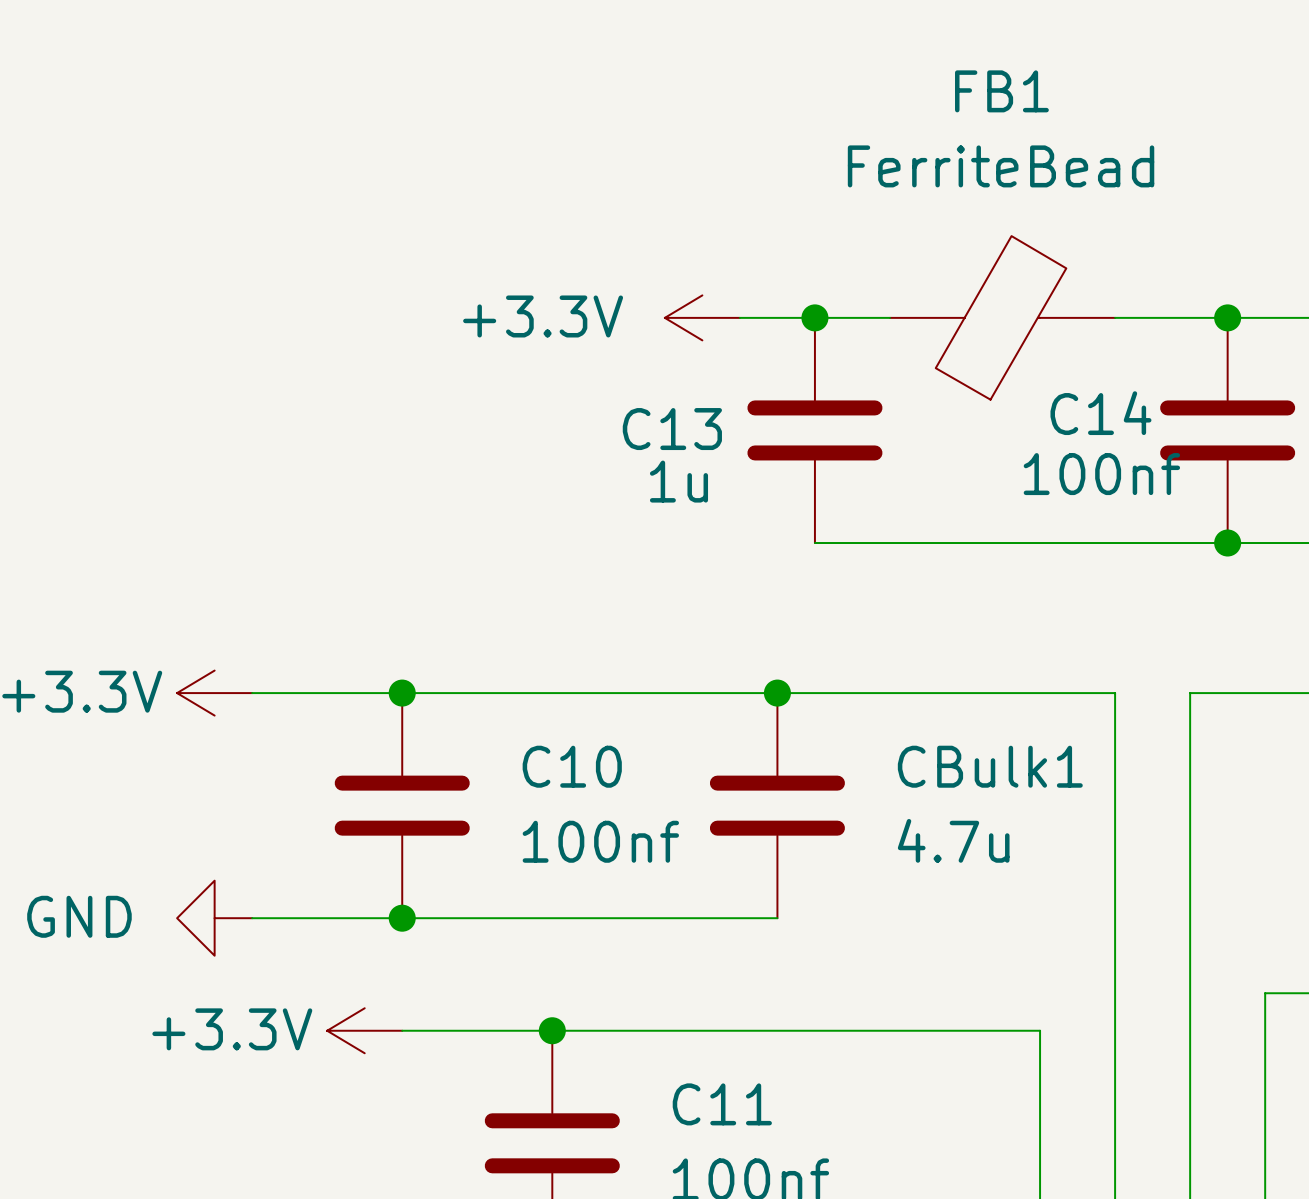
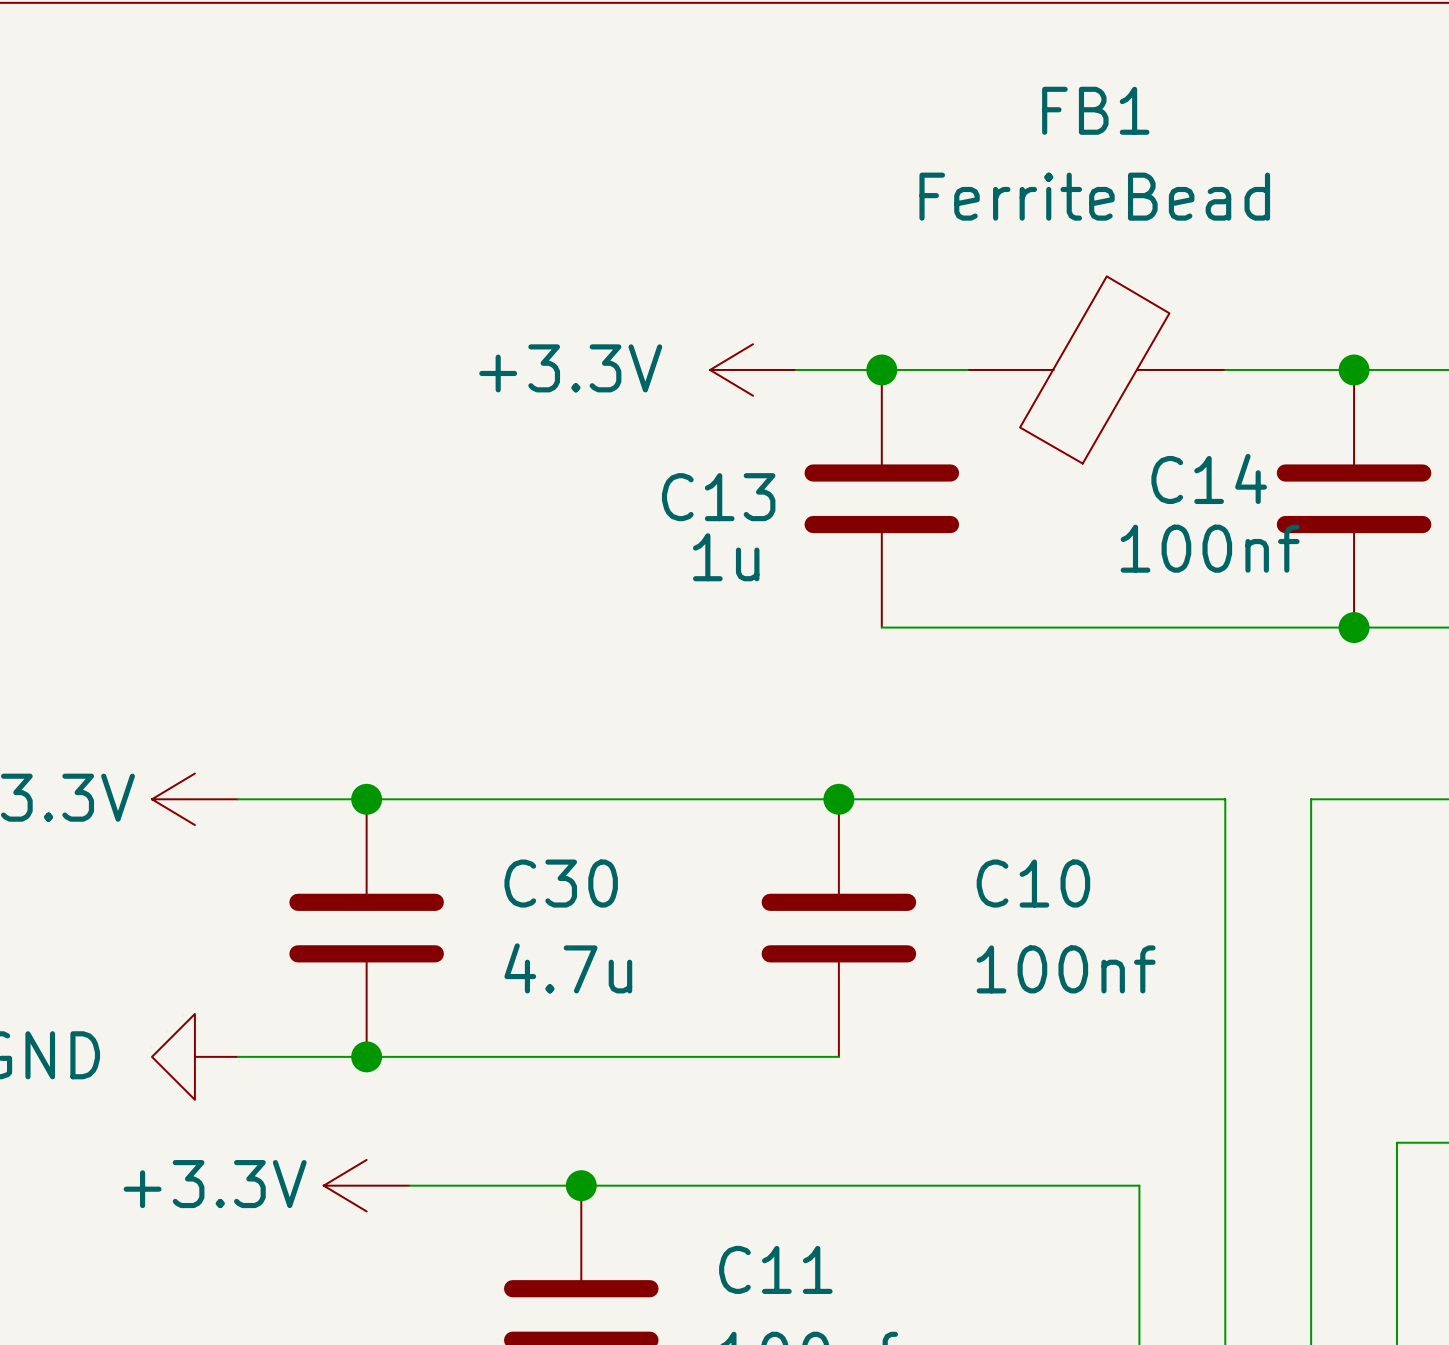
junction position: (402, 693) -> (366, 799)
CBulk1 name: CBulk1 (990, 766) -> C10 (1033, 883)
C30: none -> 4.7u (366, 928)
C10: 100nf (402, 805) -> none
CBulk1 value: 4.7u (953, 840) -> 100nf (1066, 969)
junction position: (402, 918) -> (366, 1056)

